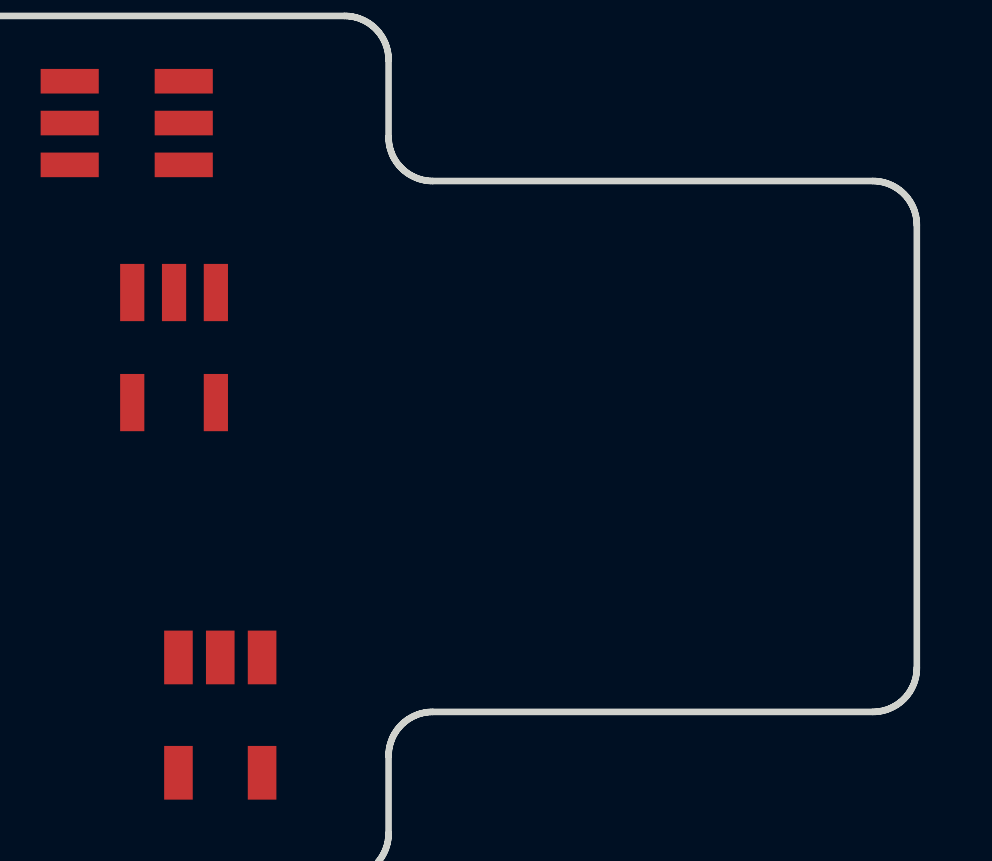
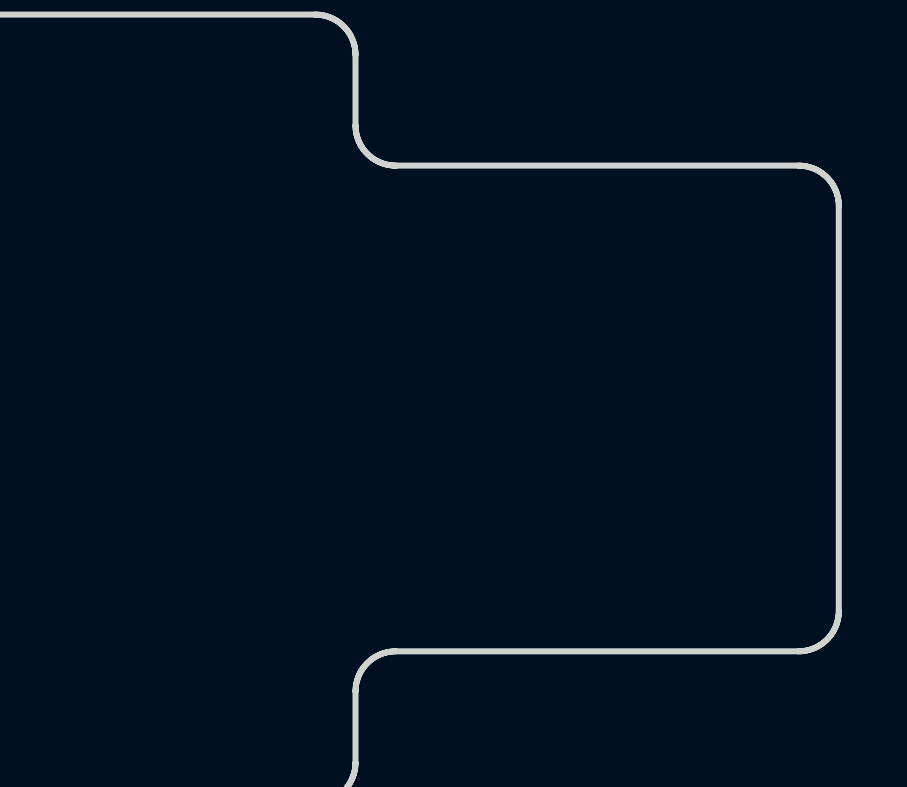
part: (126, 123) -> none
part: (174, 347) -> none
part: (220, 715) -> none

